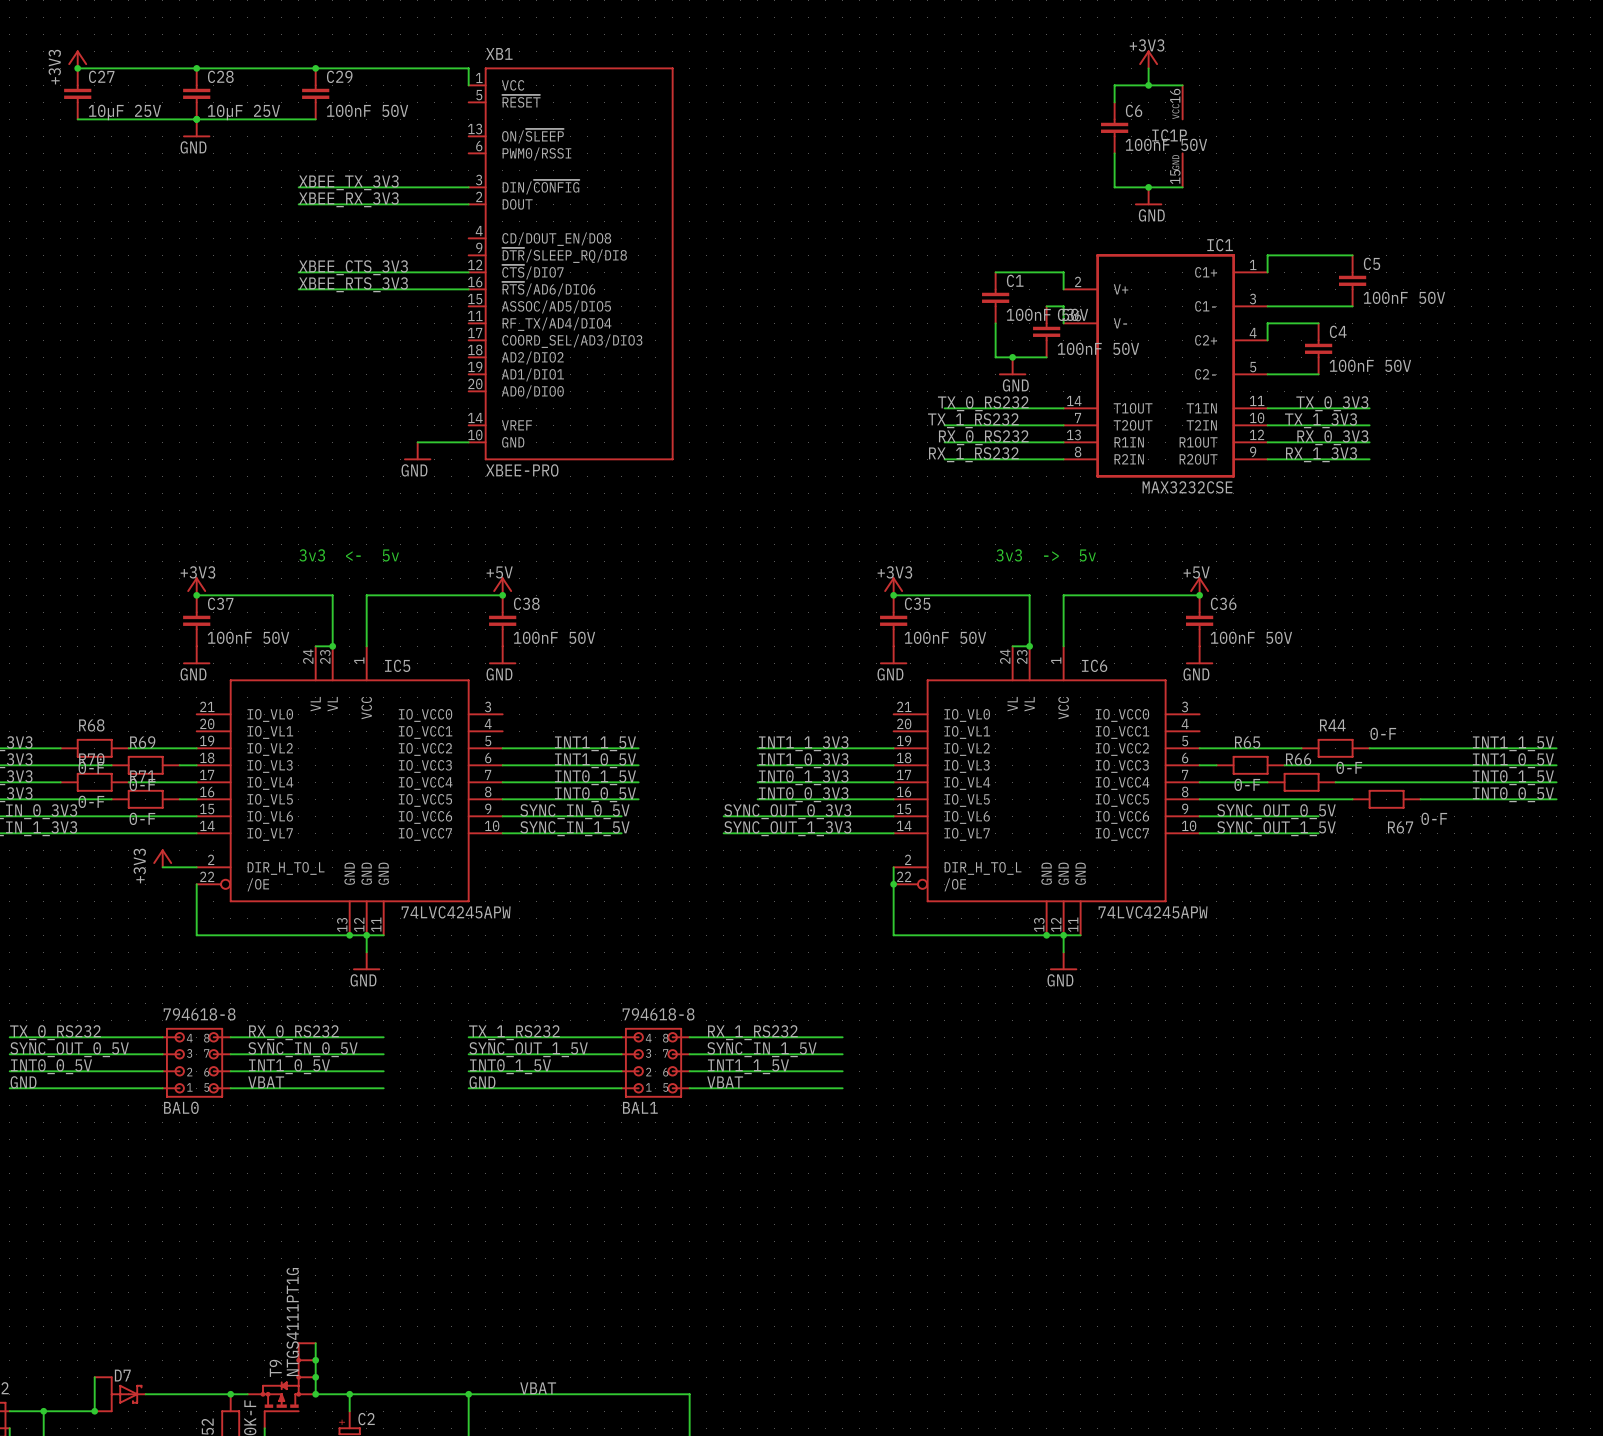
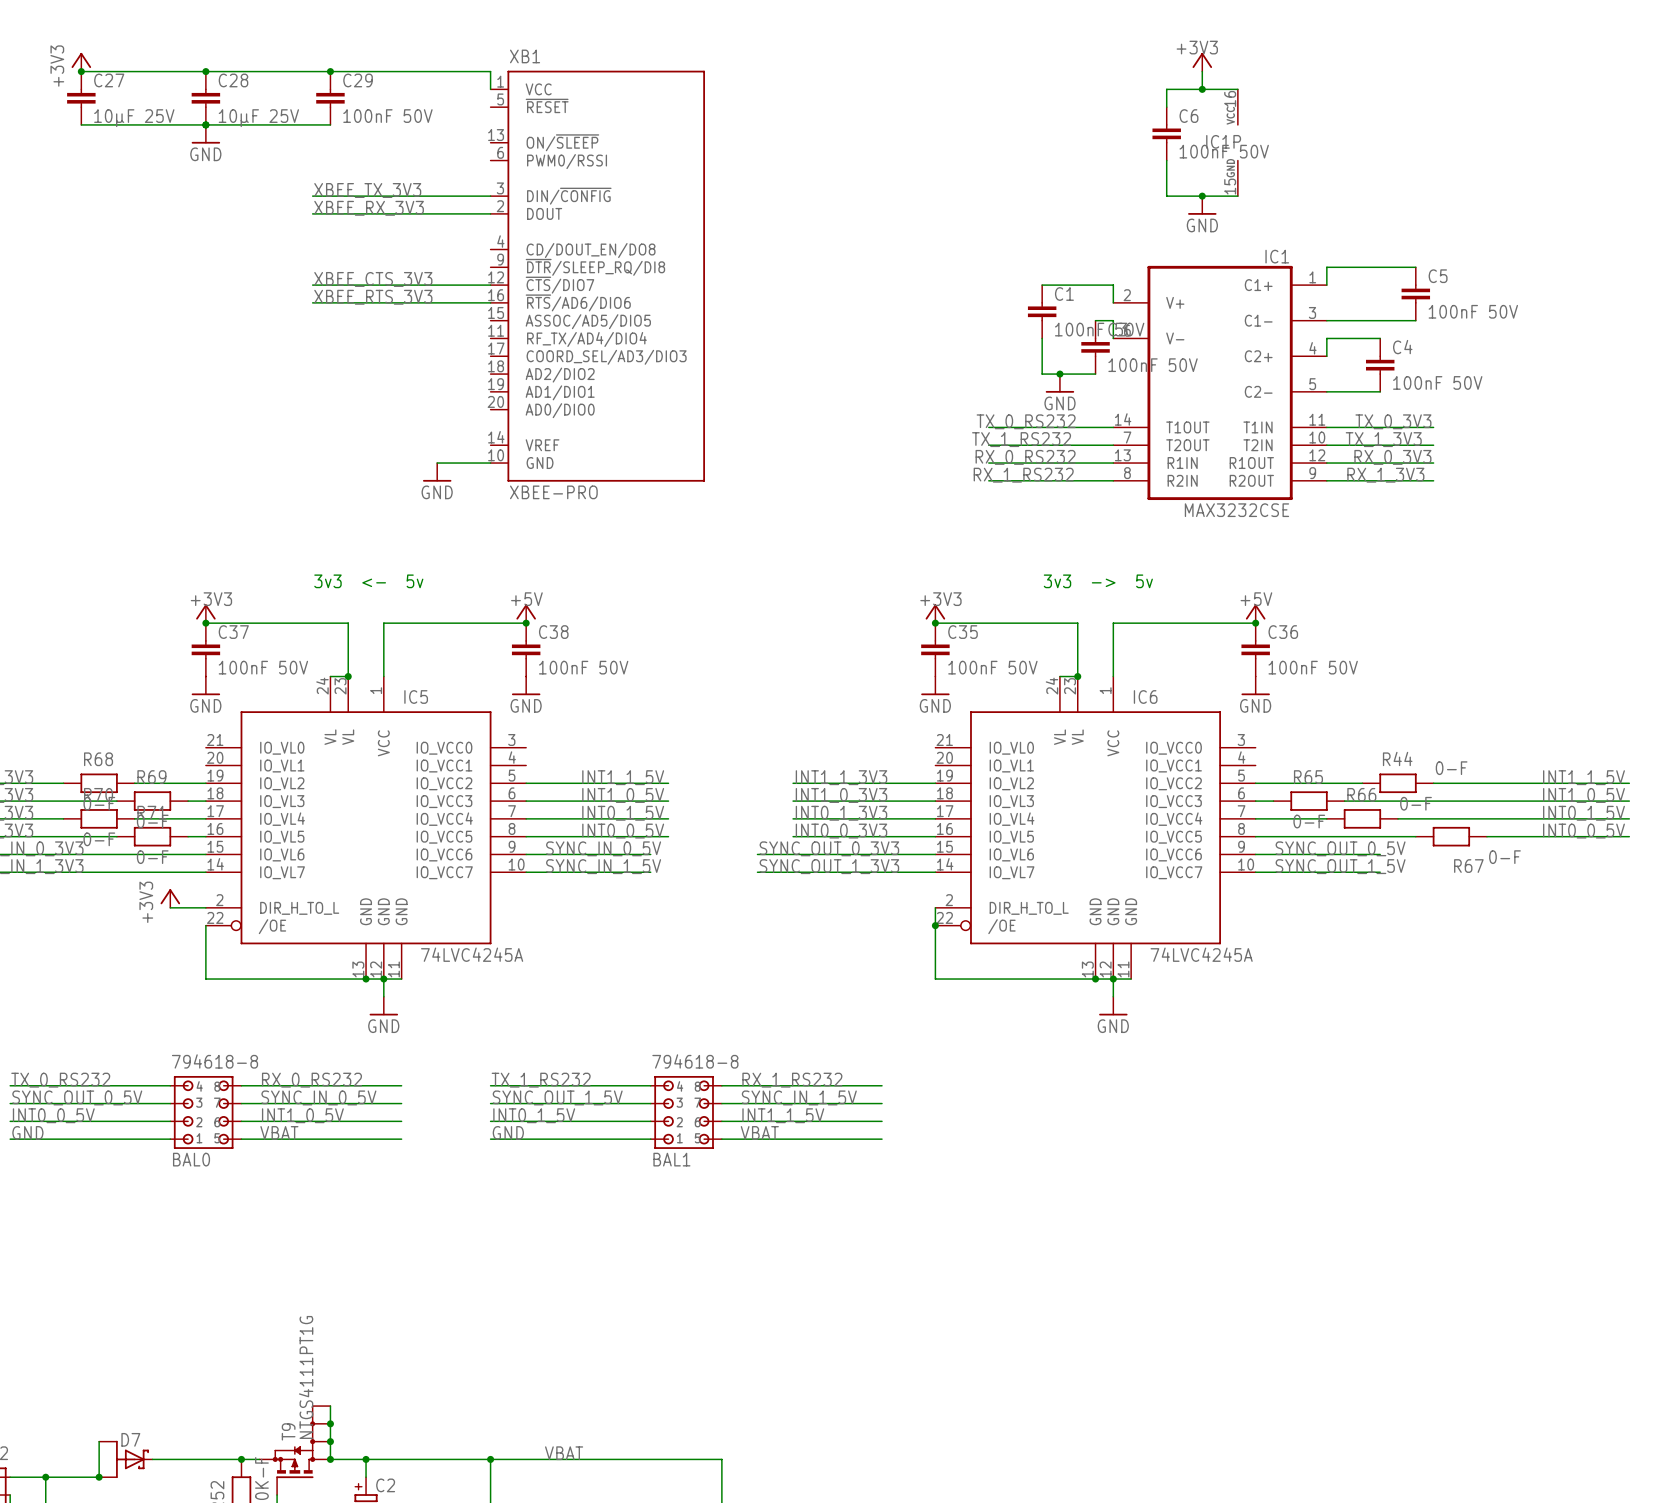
IC5 value: 74LVC4245APW (456, 912) -> 74LVC4245A (472, 954)
IC6 value: 74LVC4245APW (1153, 912) -> 74LVC4245A (1201, 954)

